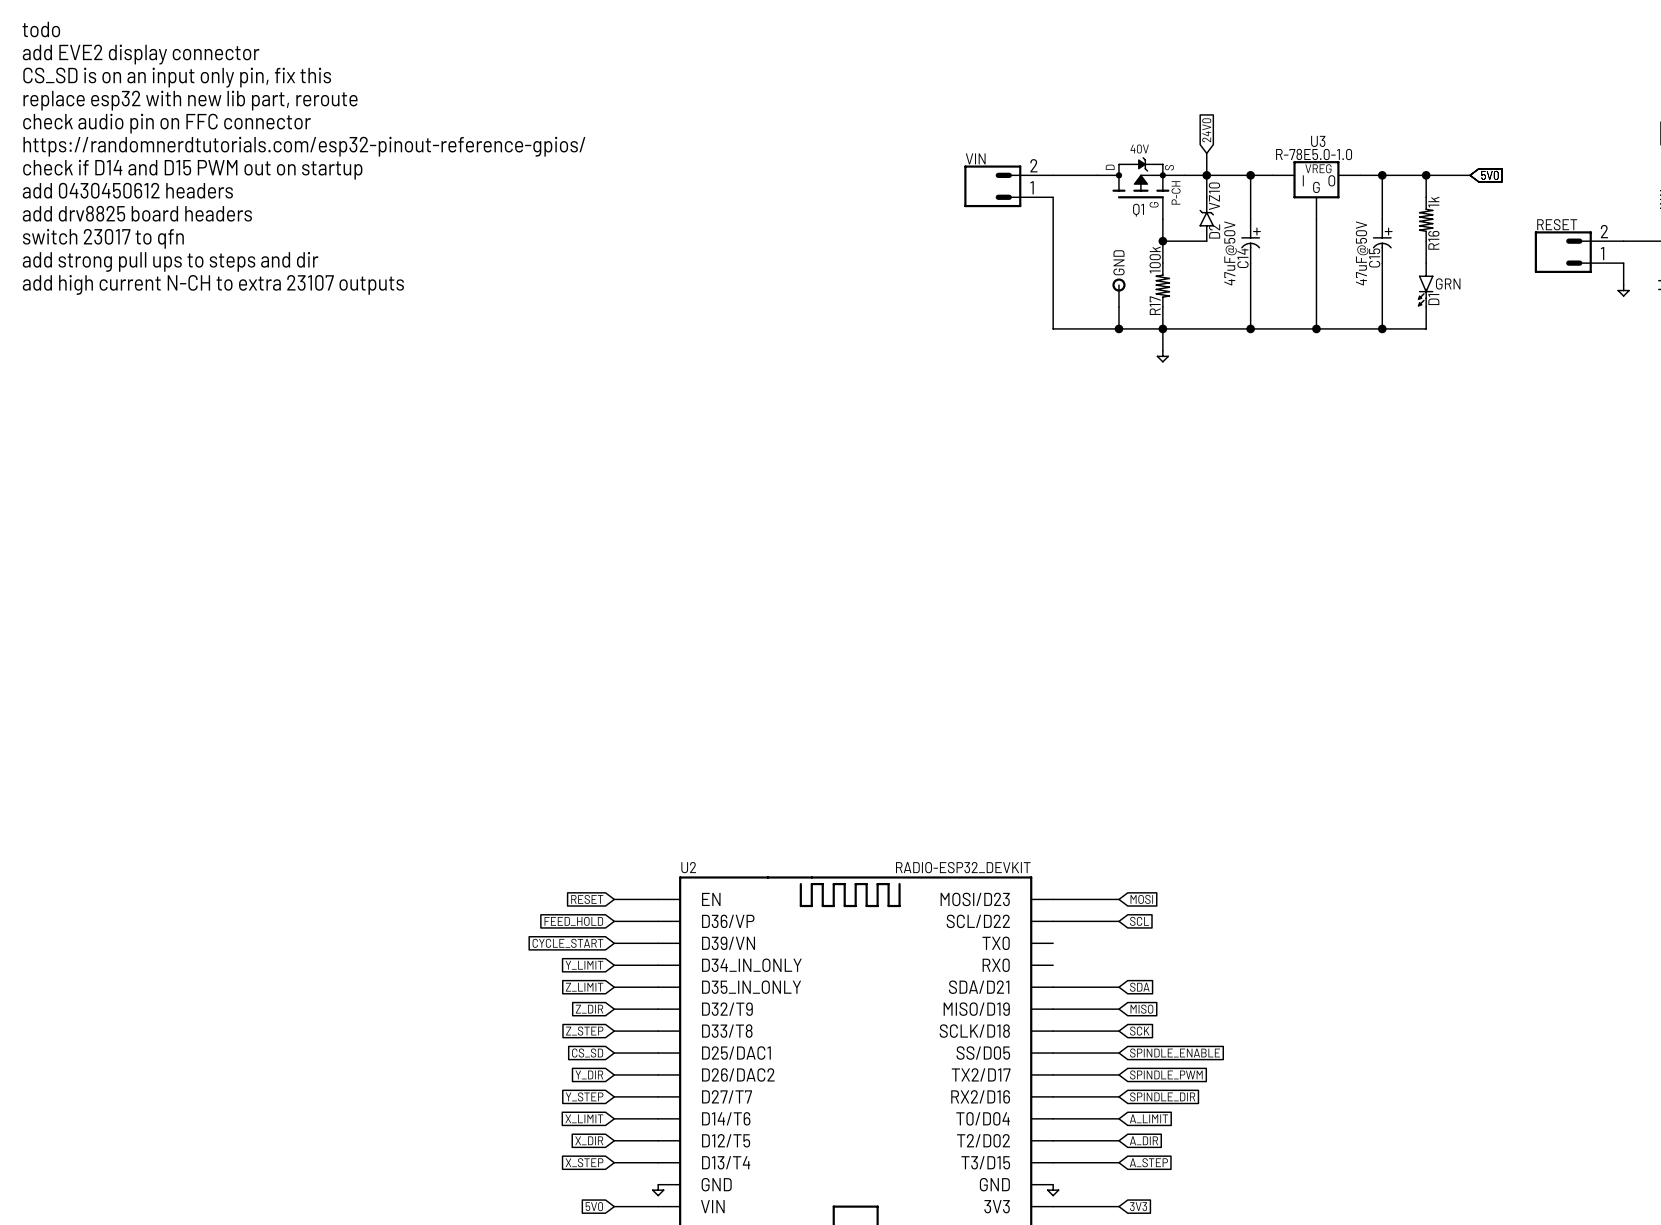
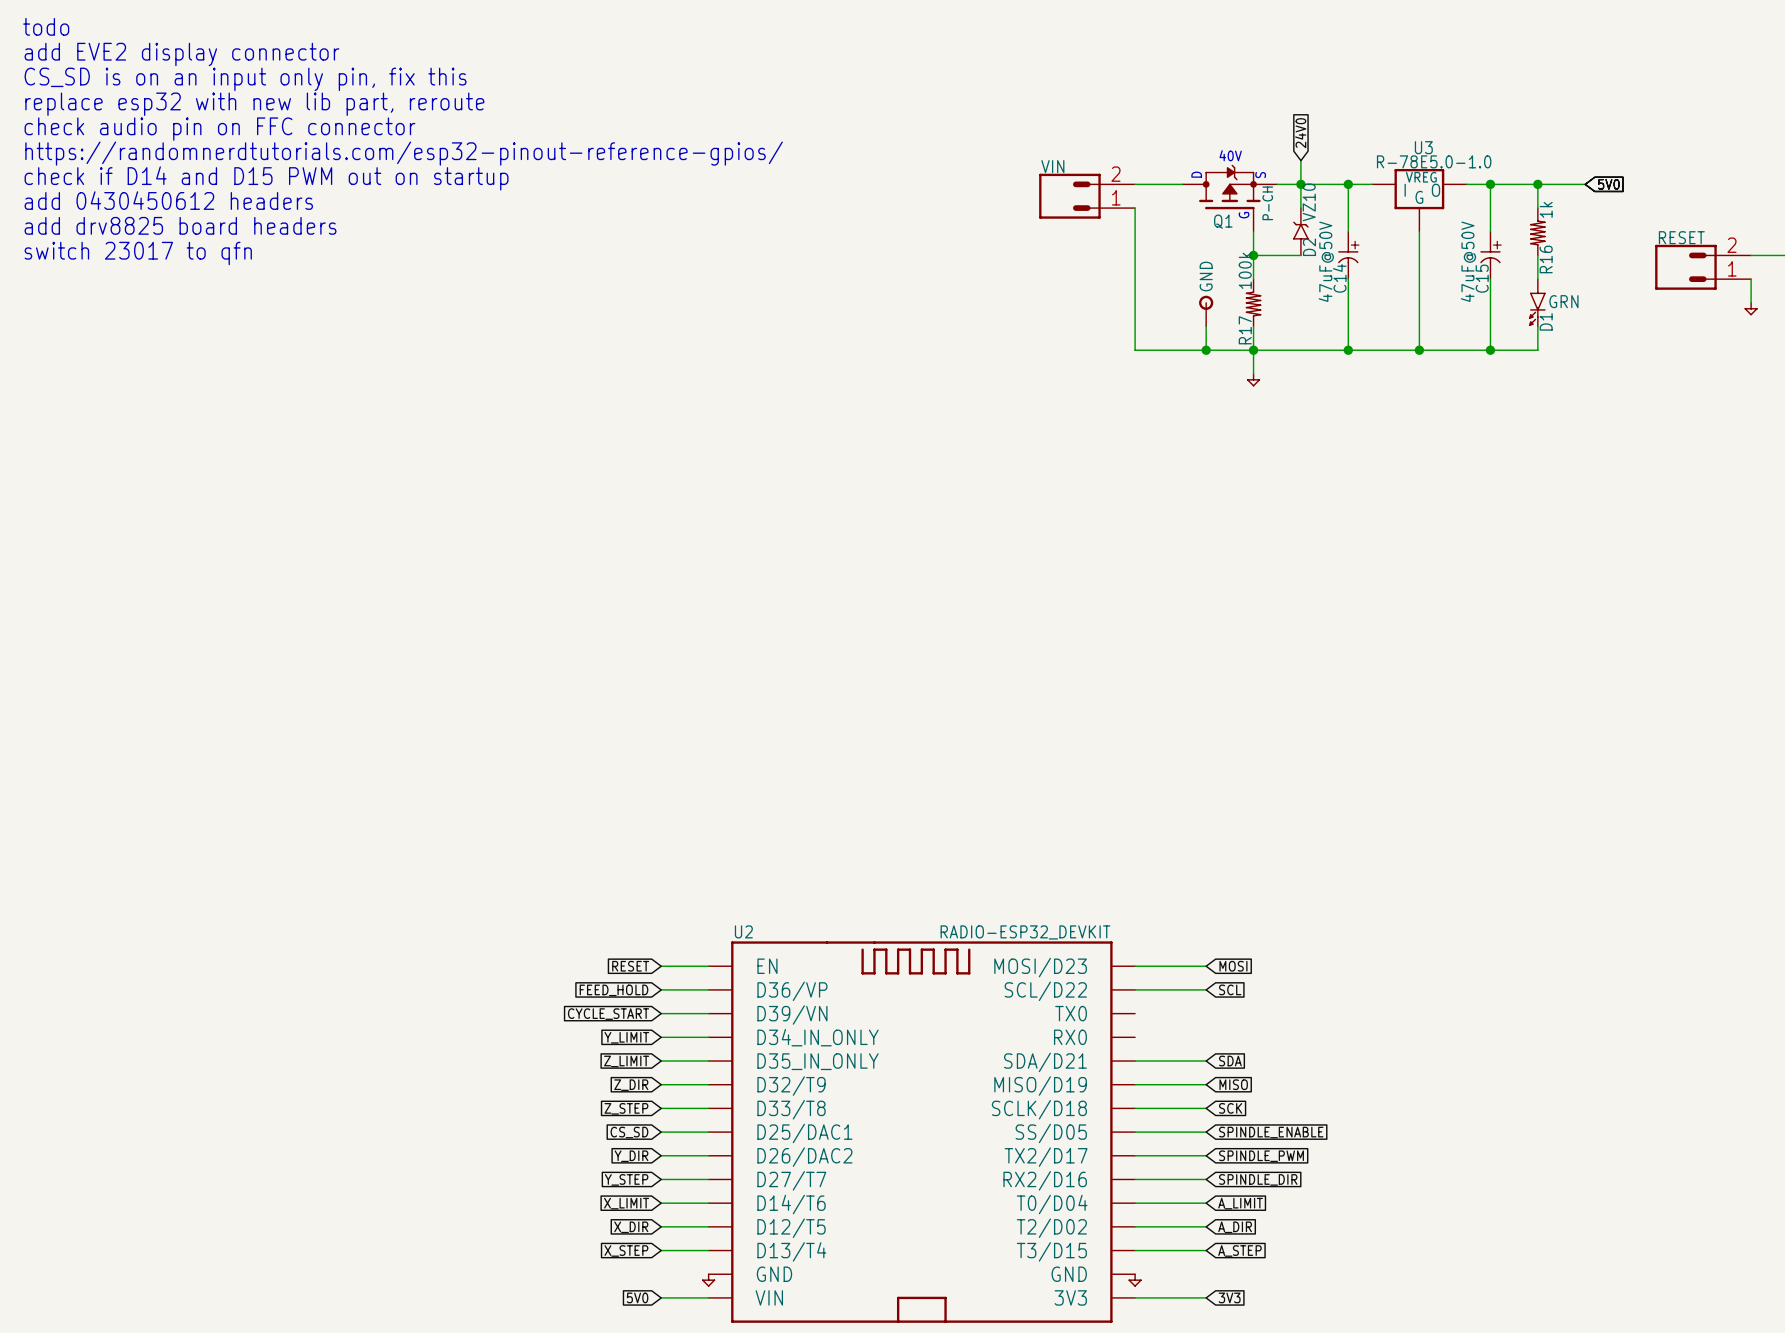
text: add strong pull ups to steps and dir (170, 261) -> none
text: add high current N-CH to extra 23107 outputs (213, 284) -> none

